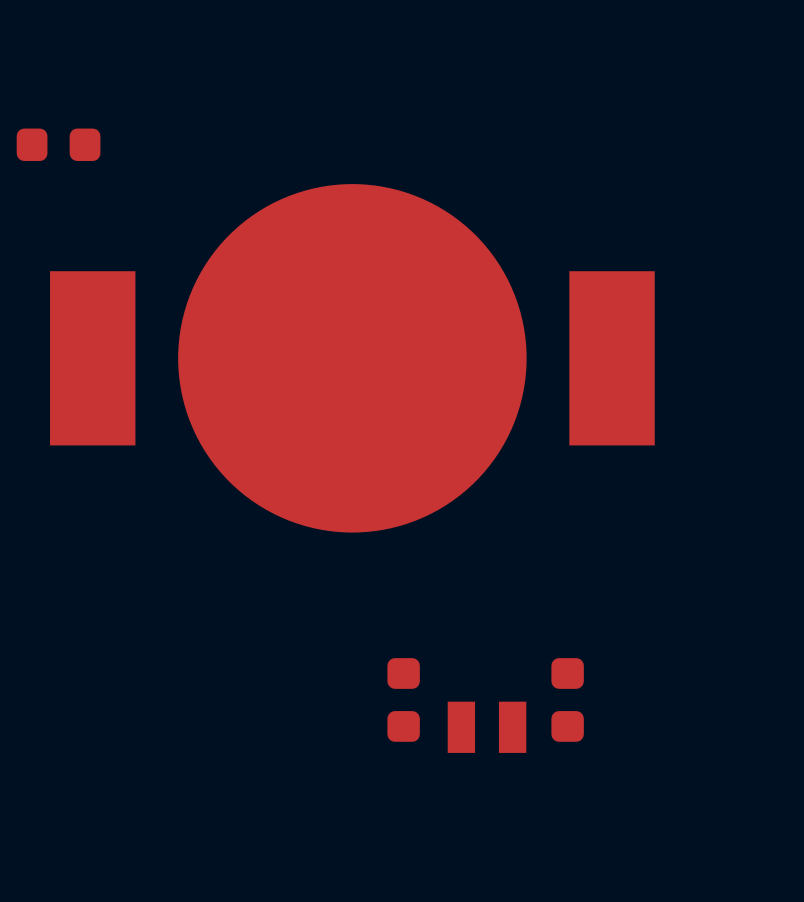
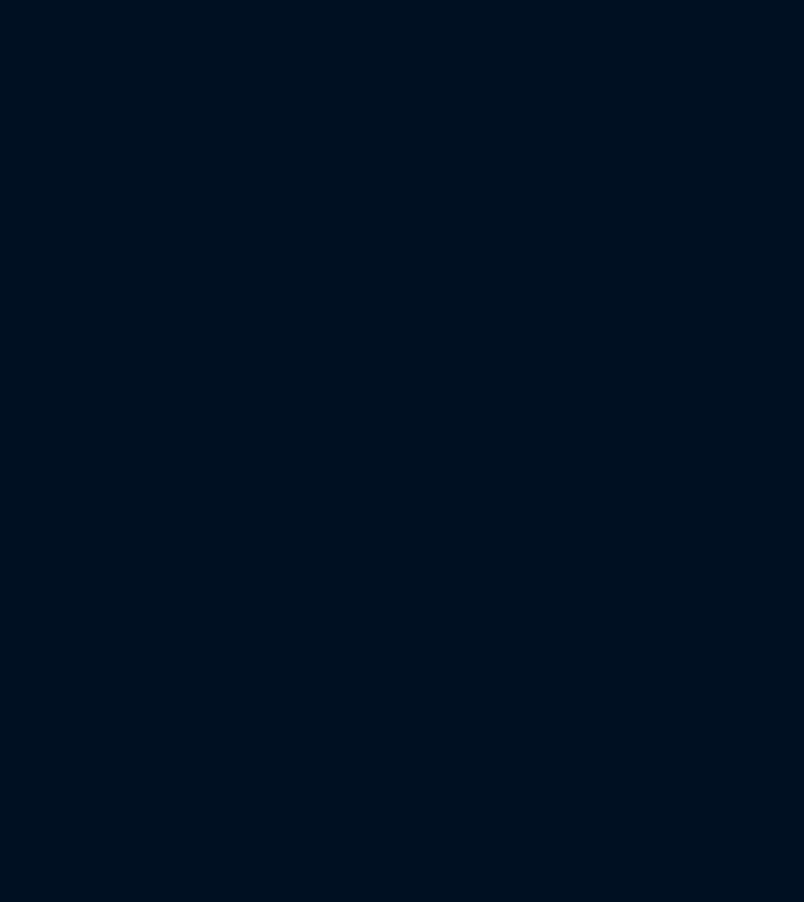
part: (58, 144) -> none
part: (352, 358) -> none
part: (403, 699) -> none
part: (567, 699) -> none
part: (486, 727) -> none

